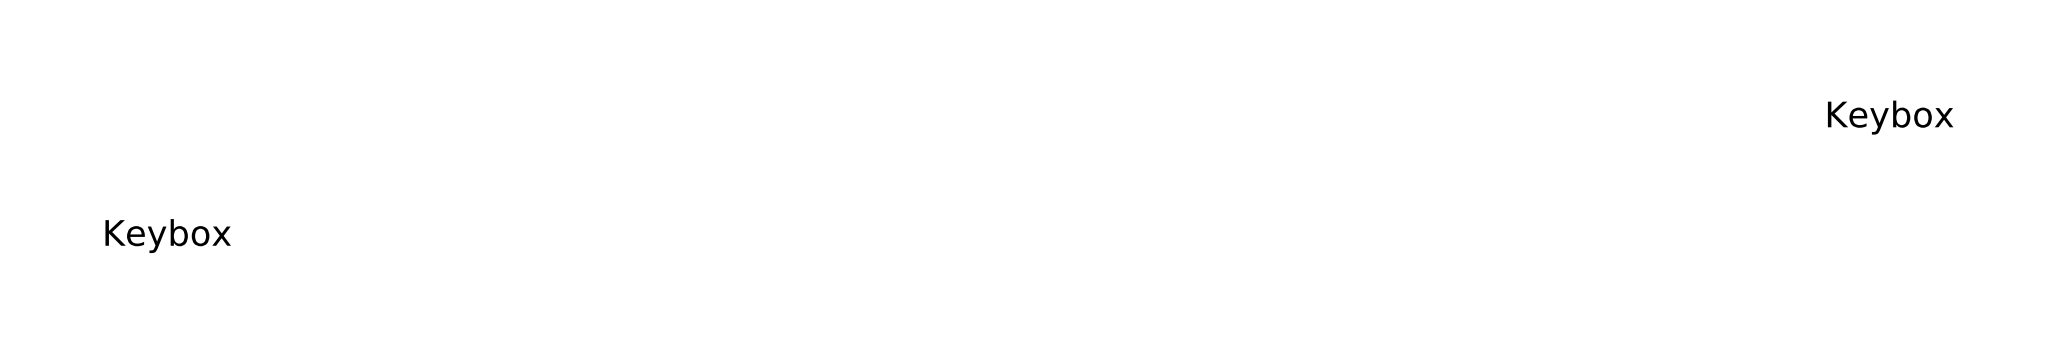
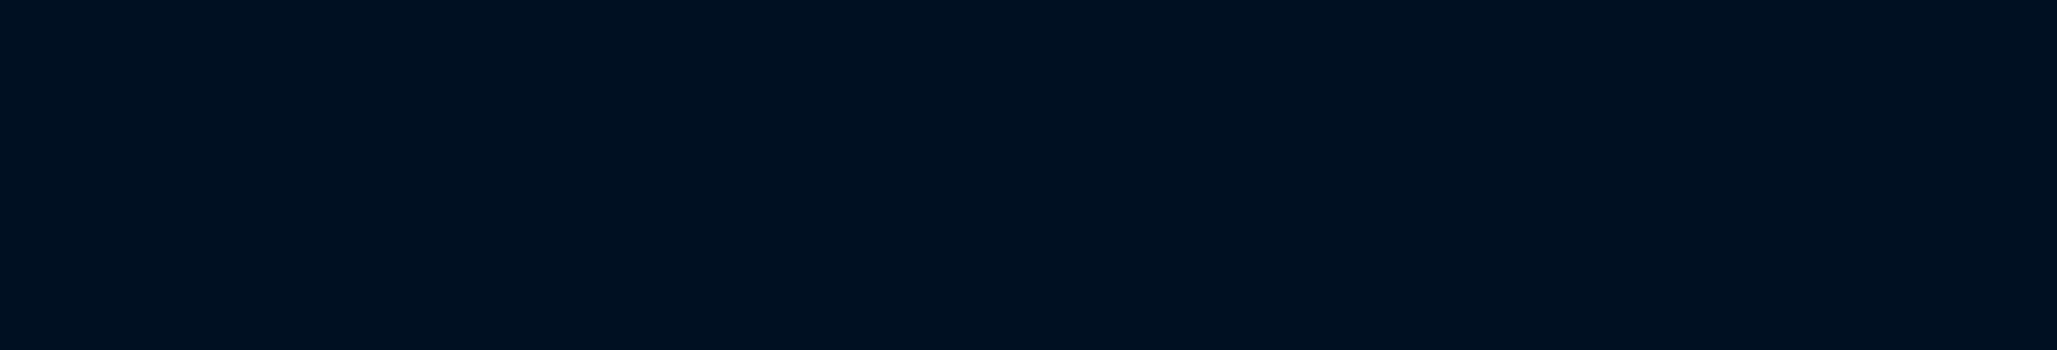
drawing: [1827, 100, 1954, 135] -> none
drawing: [105, 219, 231, 254] -> none

